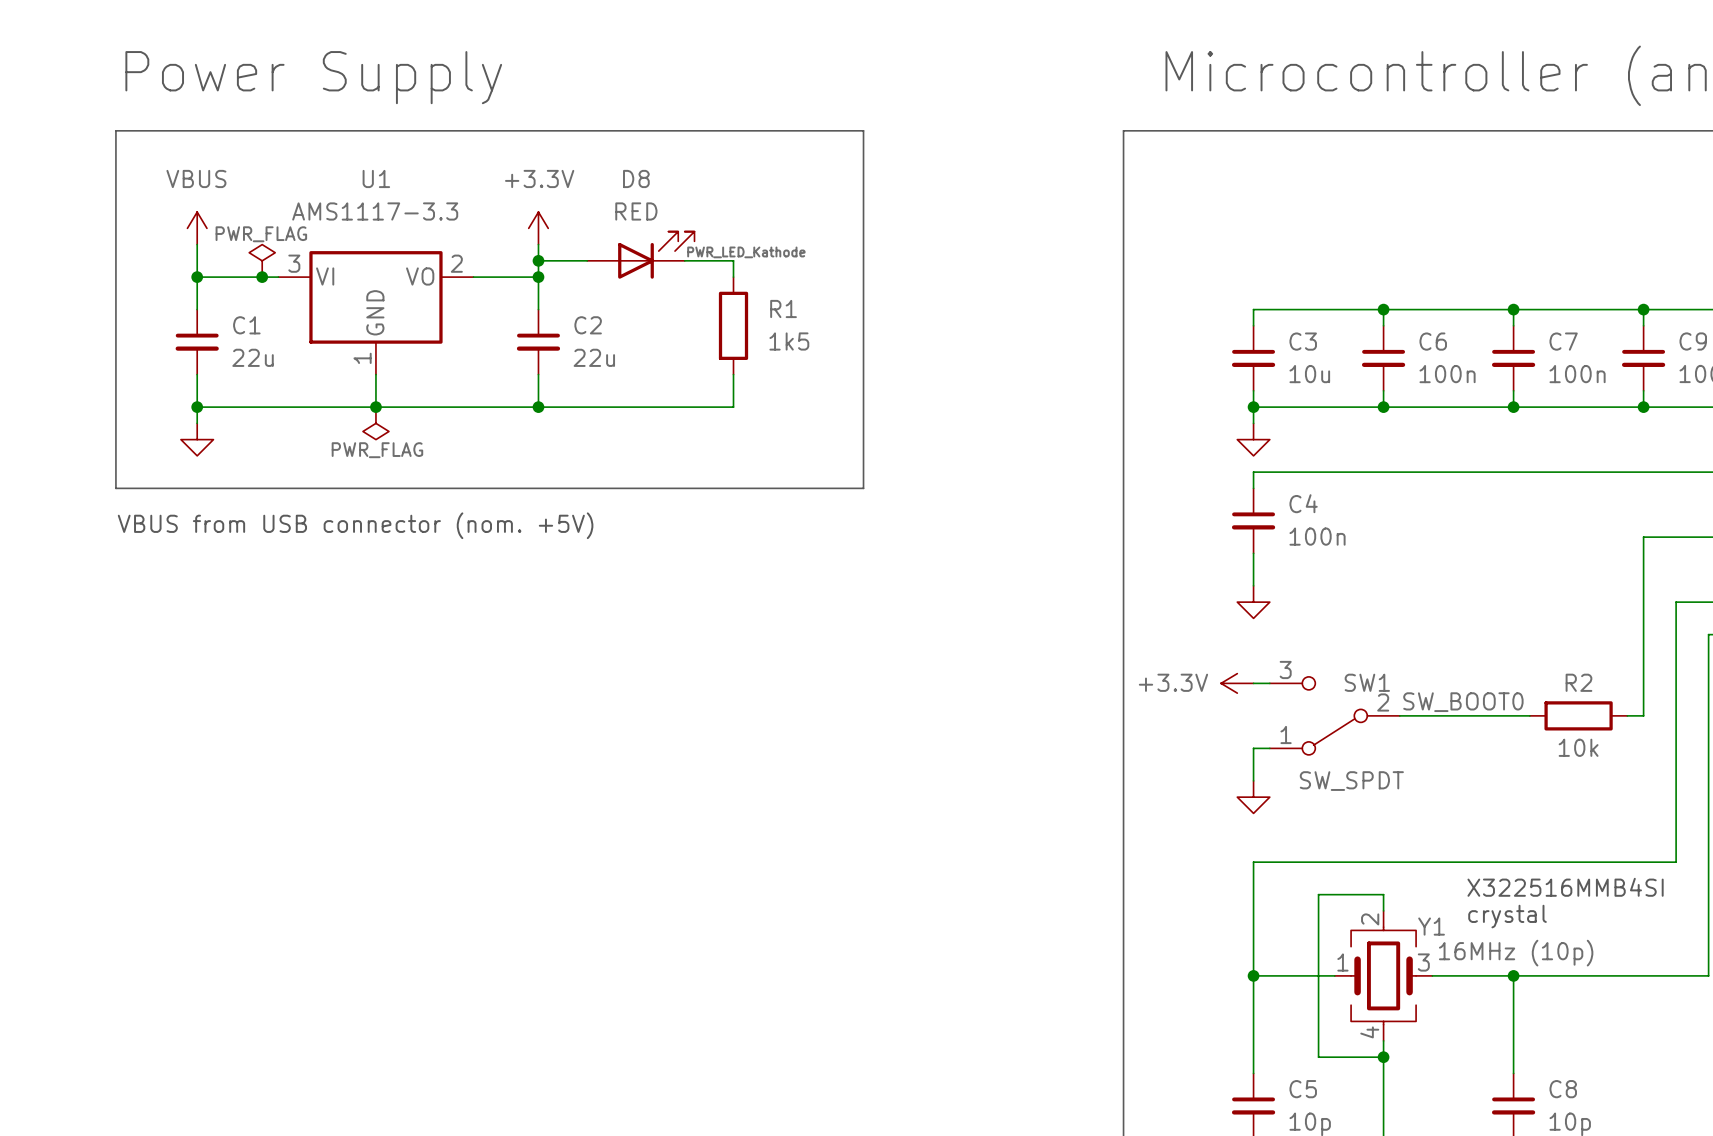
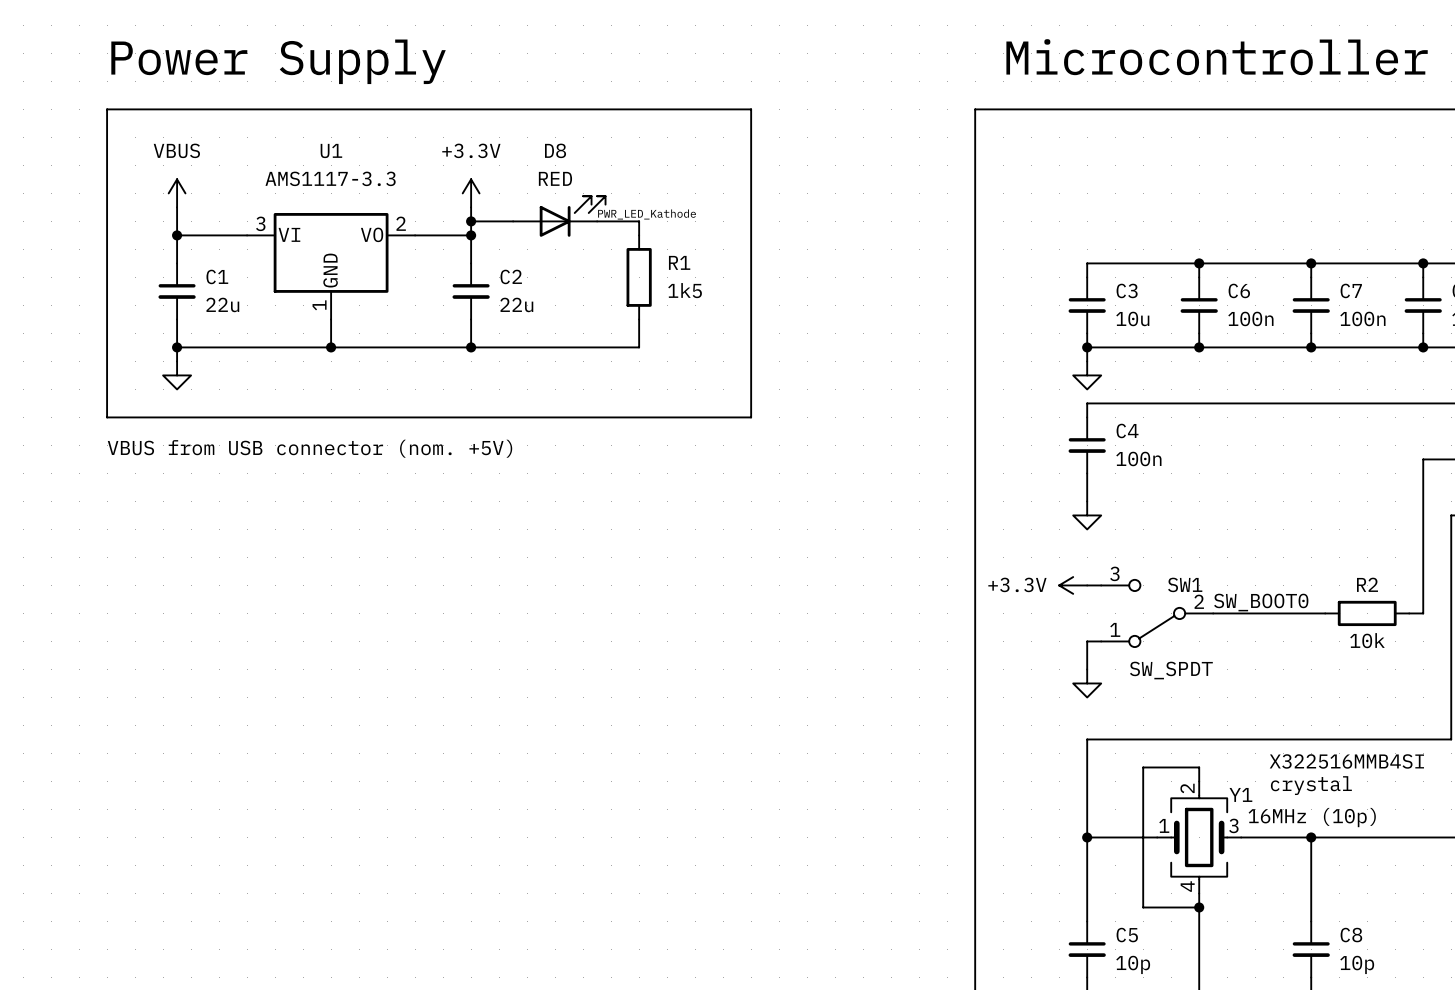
power symbol: PWR_FLAG (262, 260) -> none
junction: (262, 277) -> none
power symbol: PWR_FLAG (375, 423) -> none

